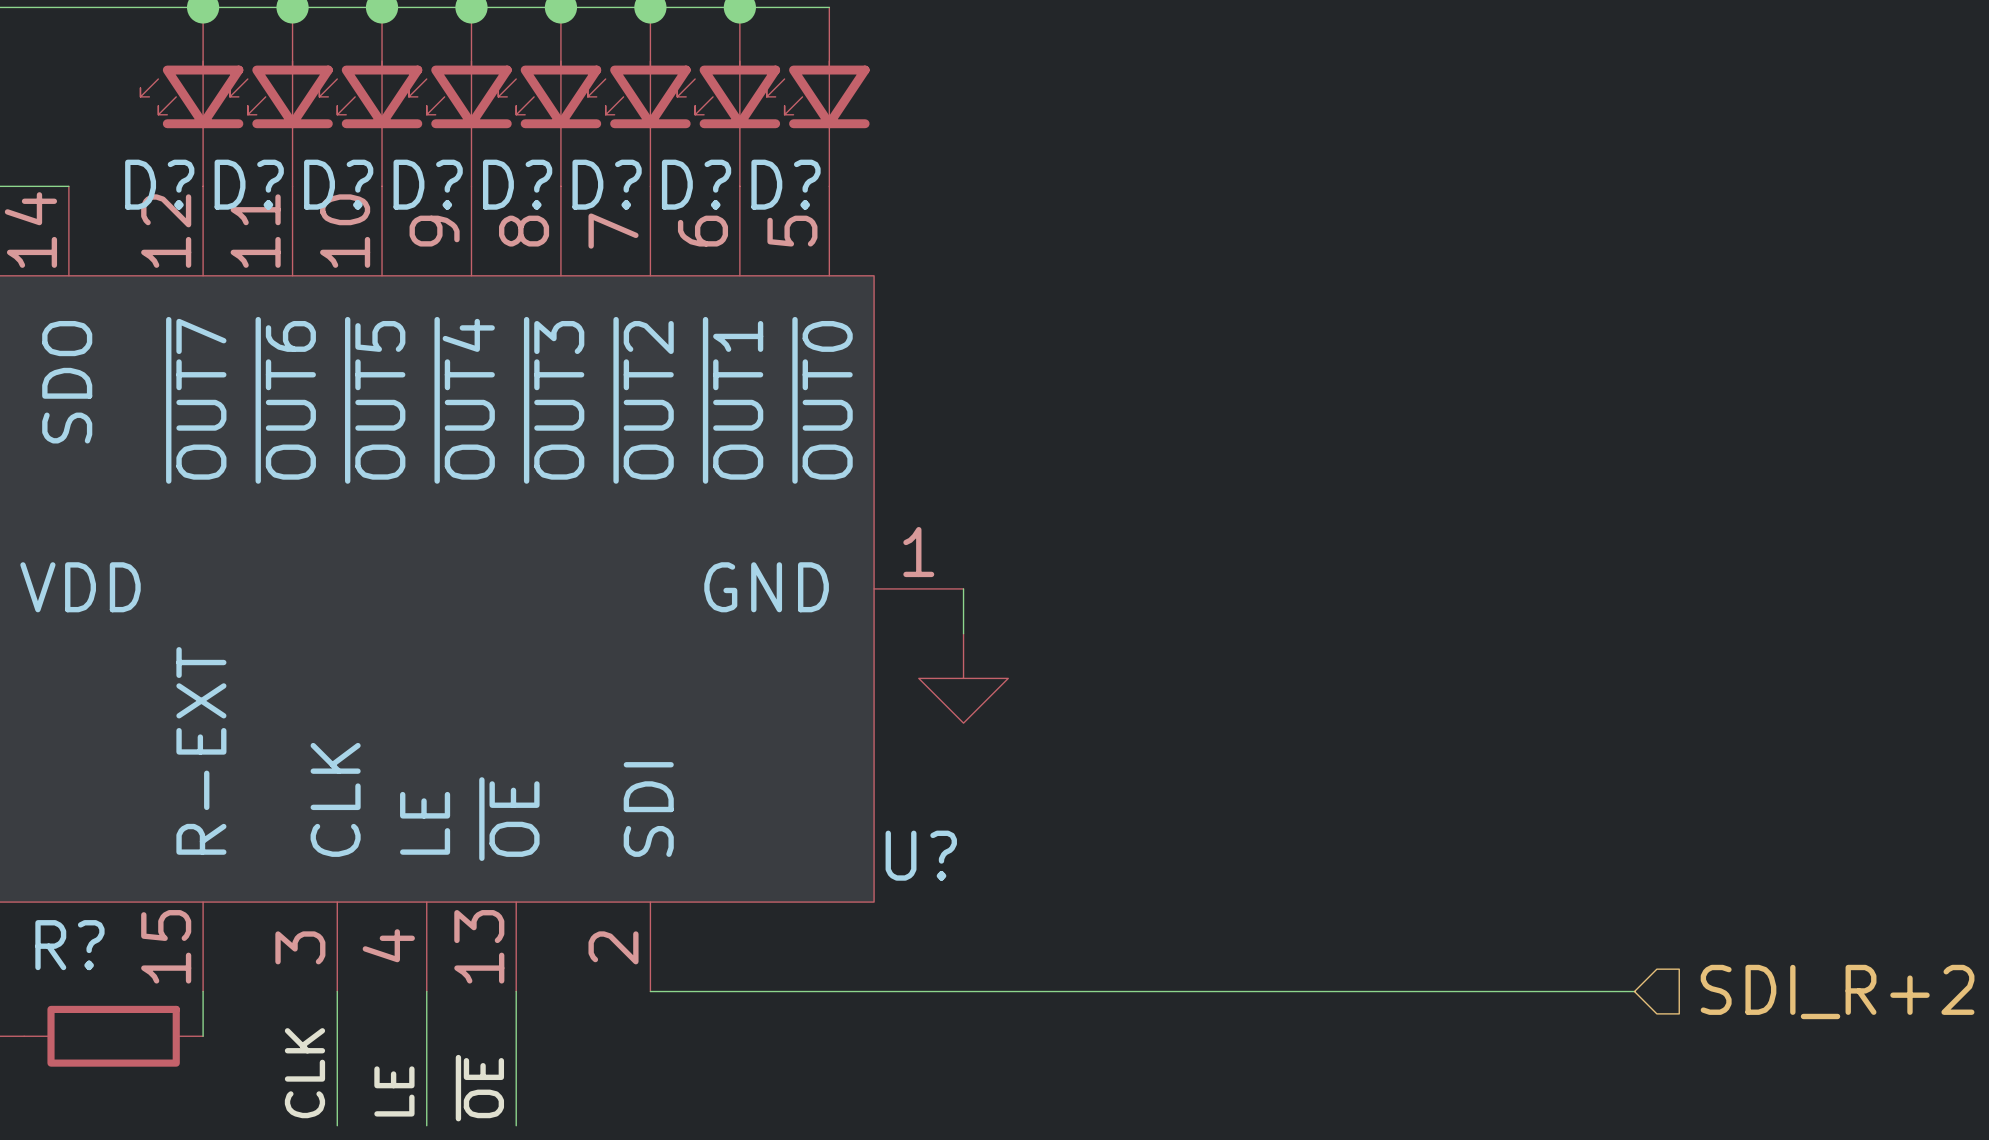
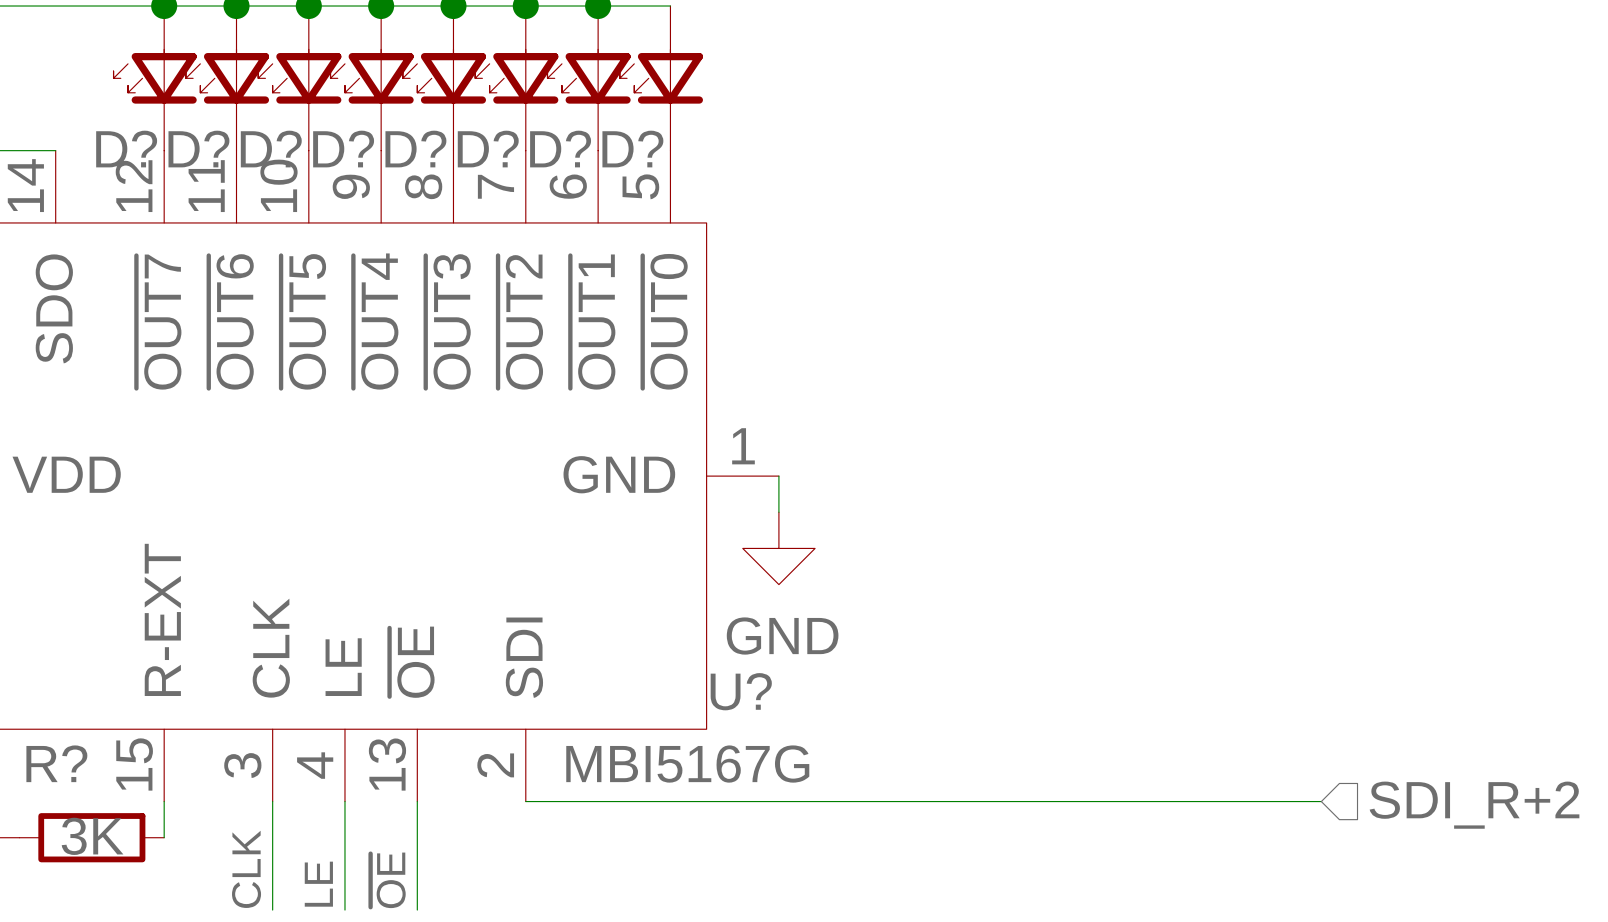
power symbol text: none -> GND (782, 636)
U? value: none -> MBI5167G (687, 764)
R? value: none -> 3K (92, 836)

